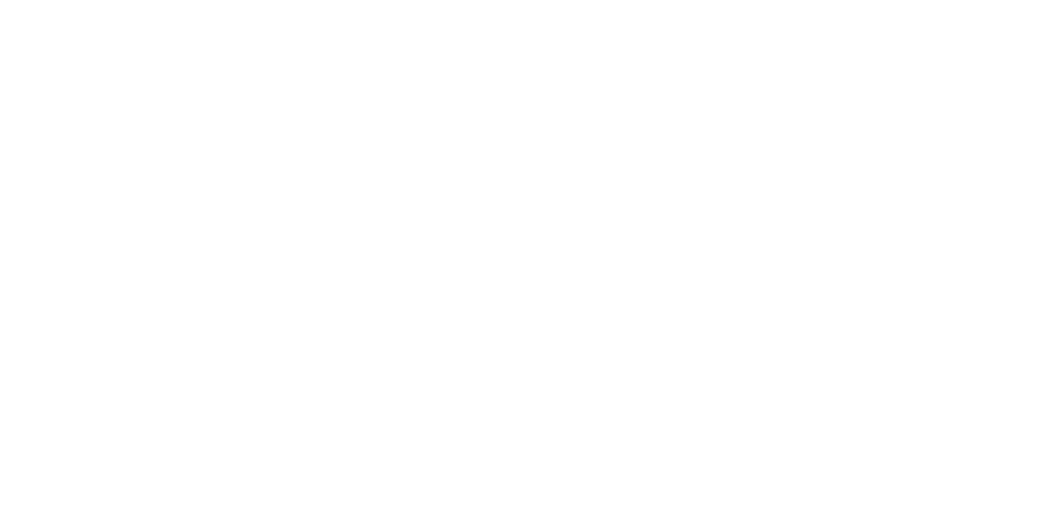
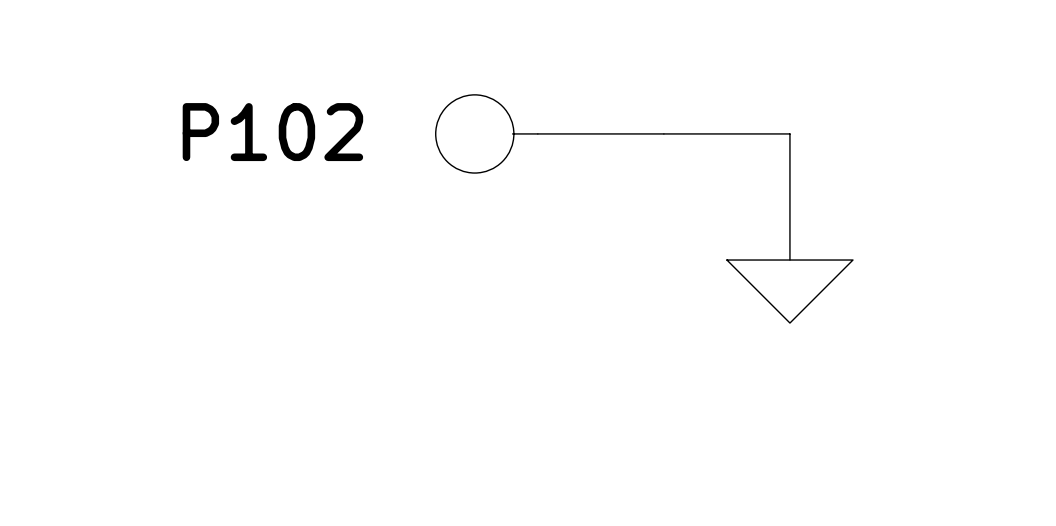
P102: none -> (549, 133)
wire: none -> (663, 133) (789, 133) (789, 260)
power symbol: none -> (789, 291)

